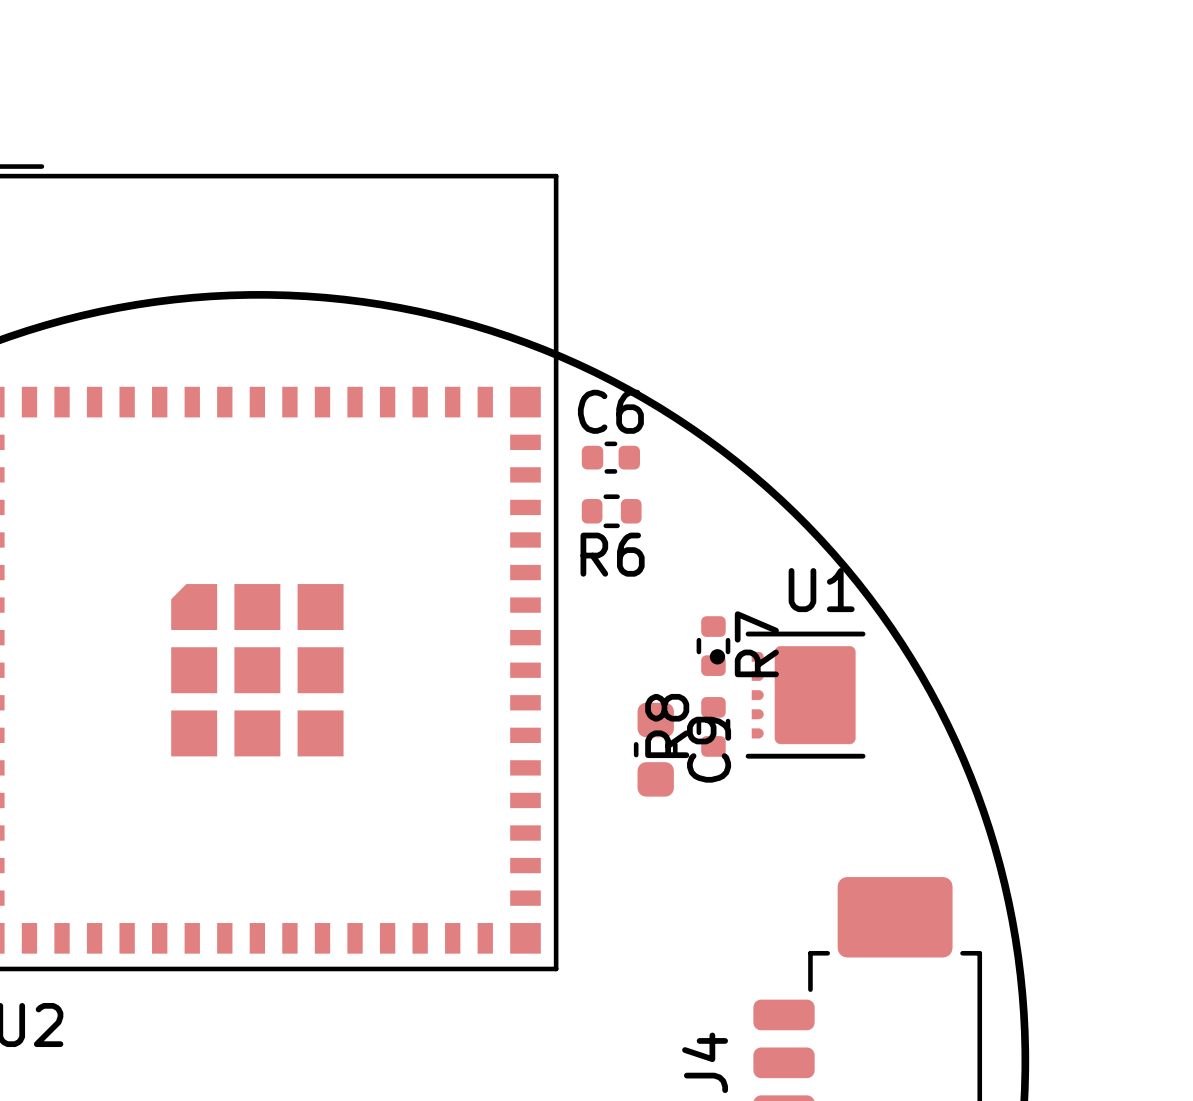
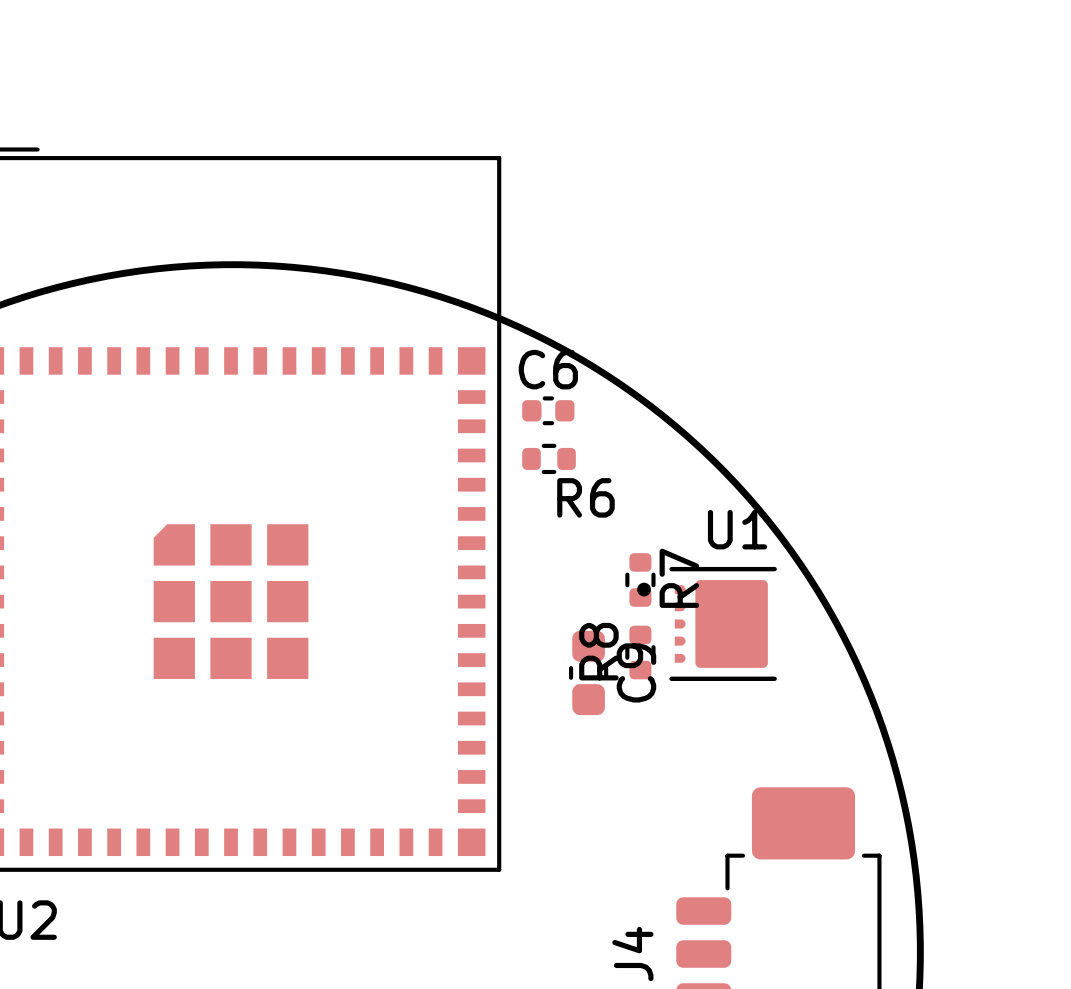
R6 name position: R6 (612, 554) -> R6 (585, 497)

